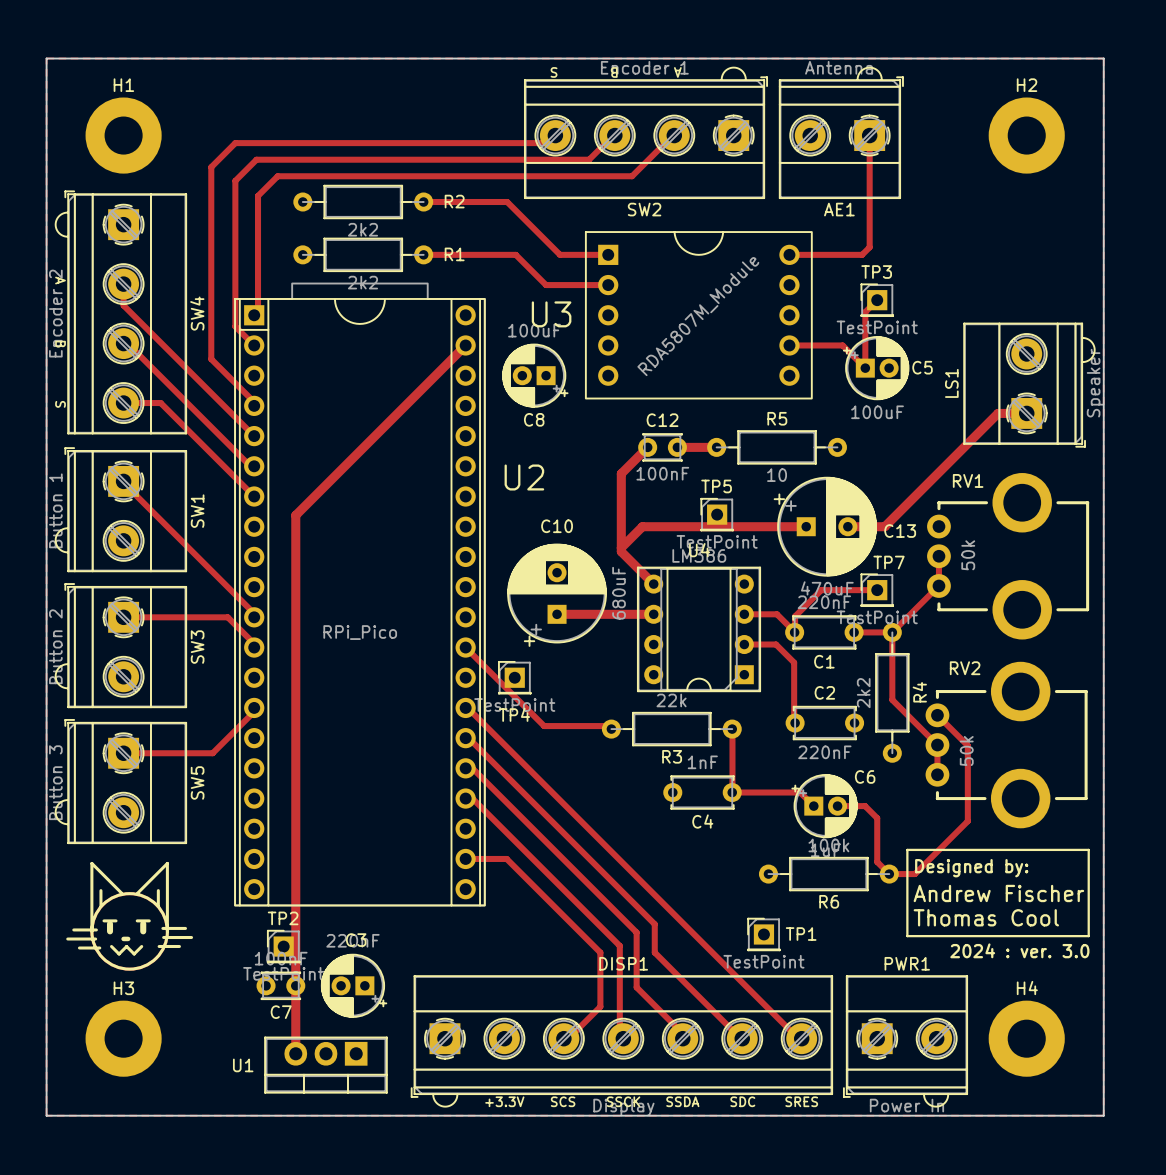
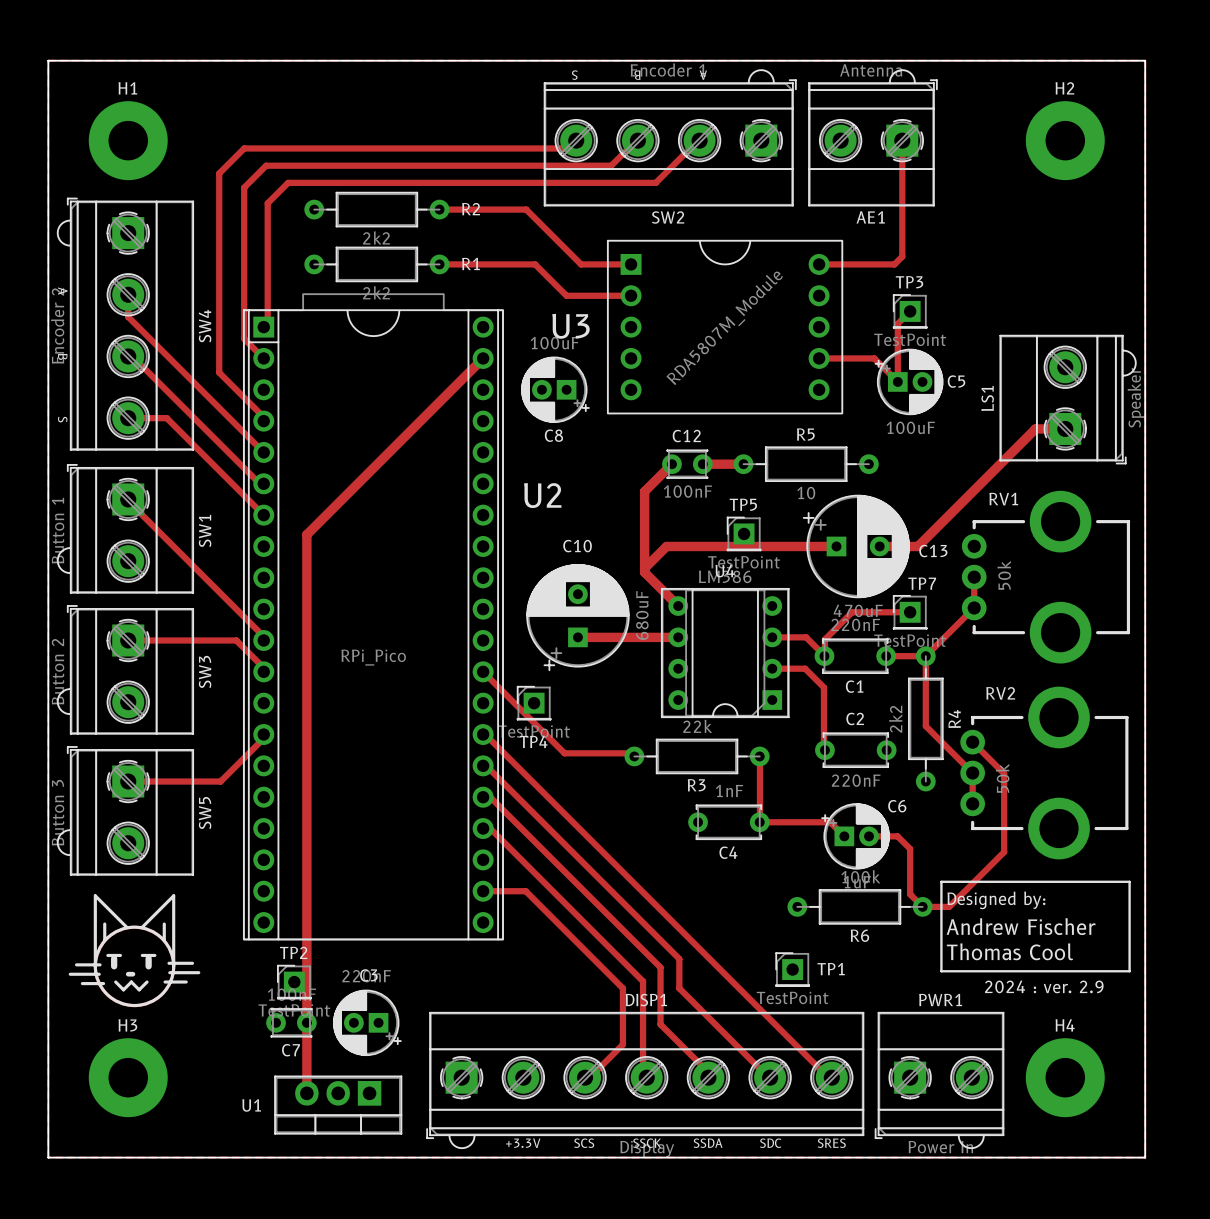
text: 2024 : ver. 3.0 (1019, 950) -> 2024 : ver. 2.9 (1044, 986)

